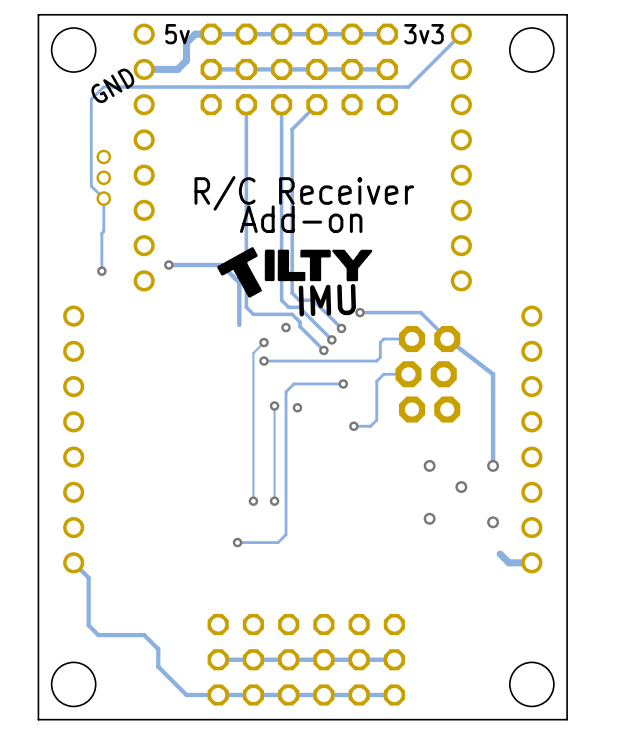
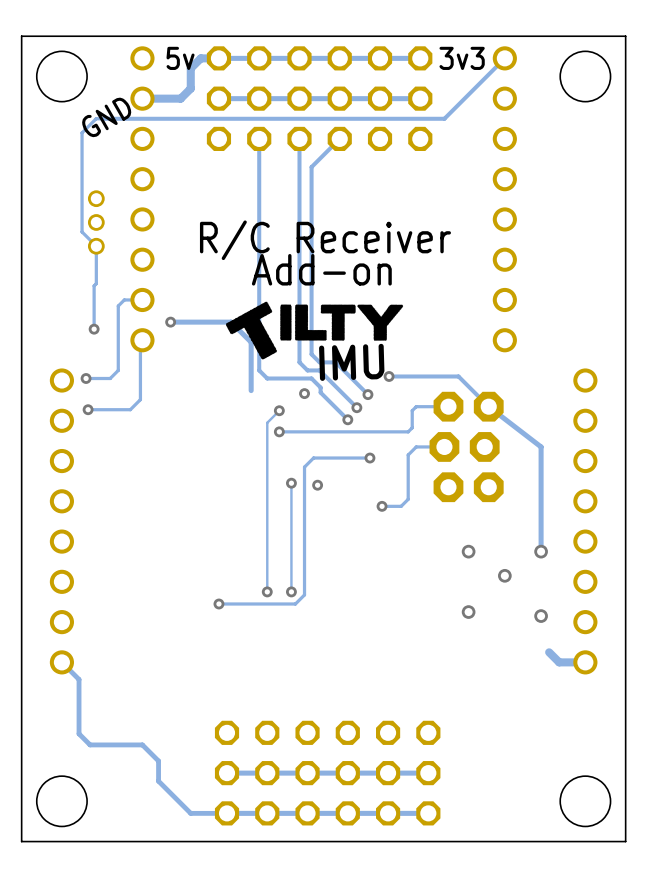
track: none -> (144, 299) (124, 299) (118, 306) (118, 370) (110, 378) (86, 378)
track: none -> (140, 340) (140, 399) (130, 409) (88, 409)
via: none -> (86, 378)
via: none -> (88, 409)
track: (286, 503) (286, 534) (278, 542) (237, 542) -> (304, 594) (295, 603) (218, 603)
via position: (237, 542) -> (218, 603)

